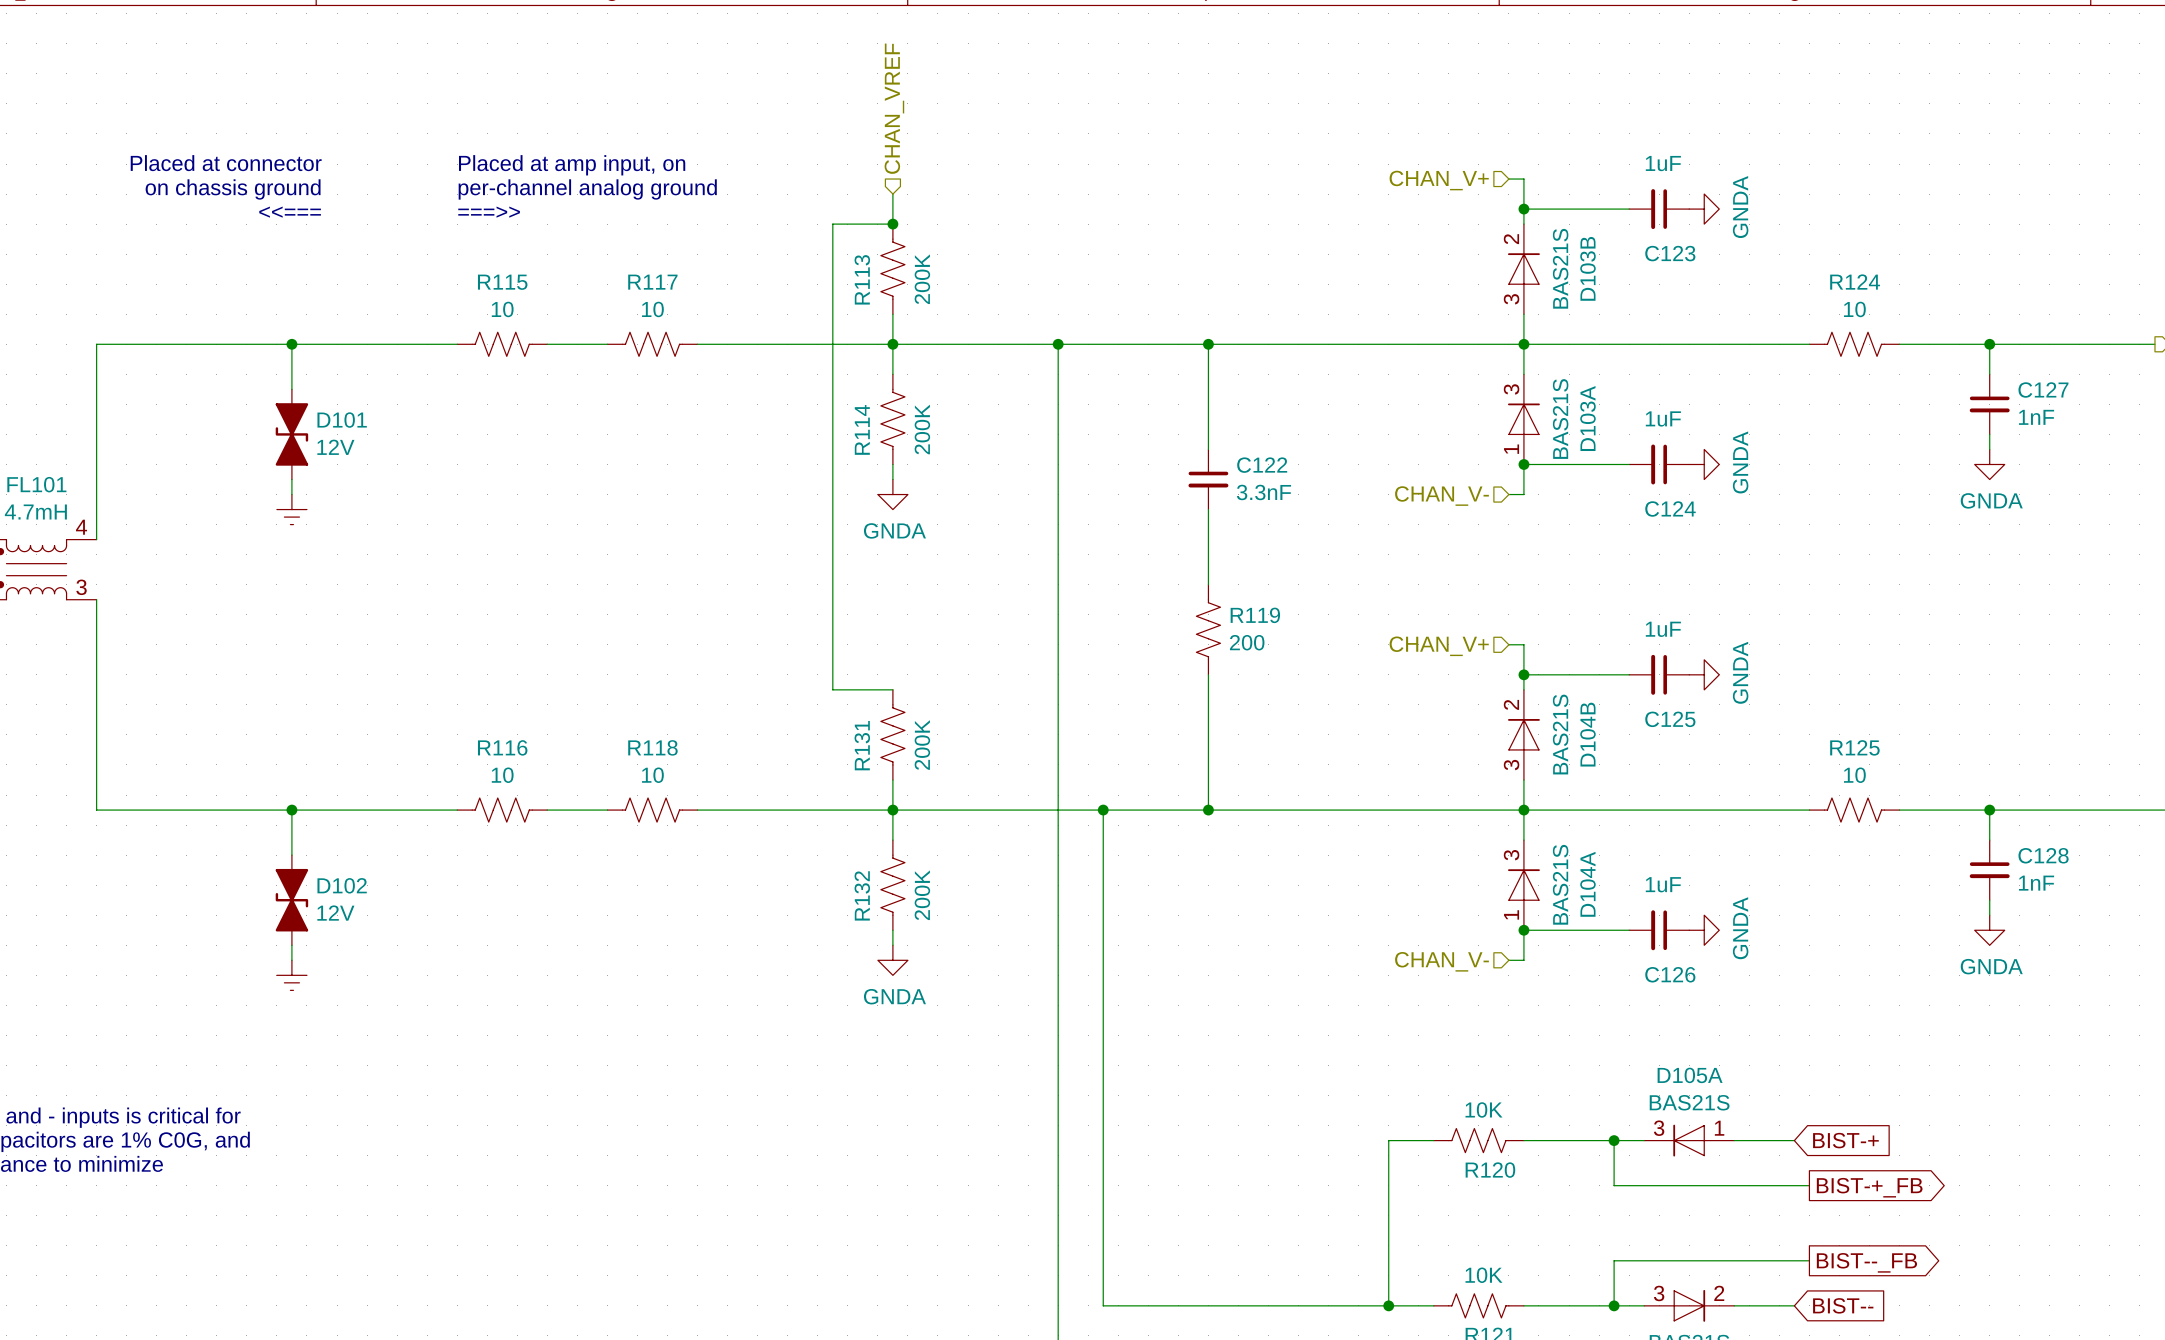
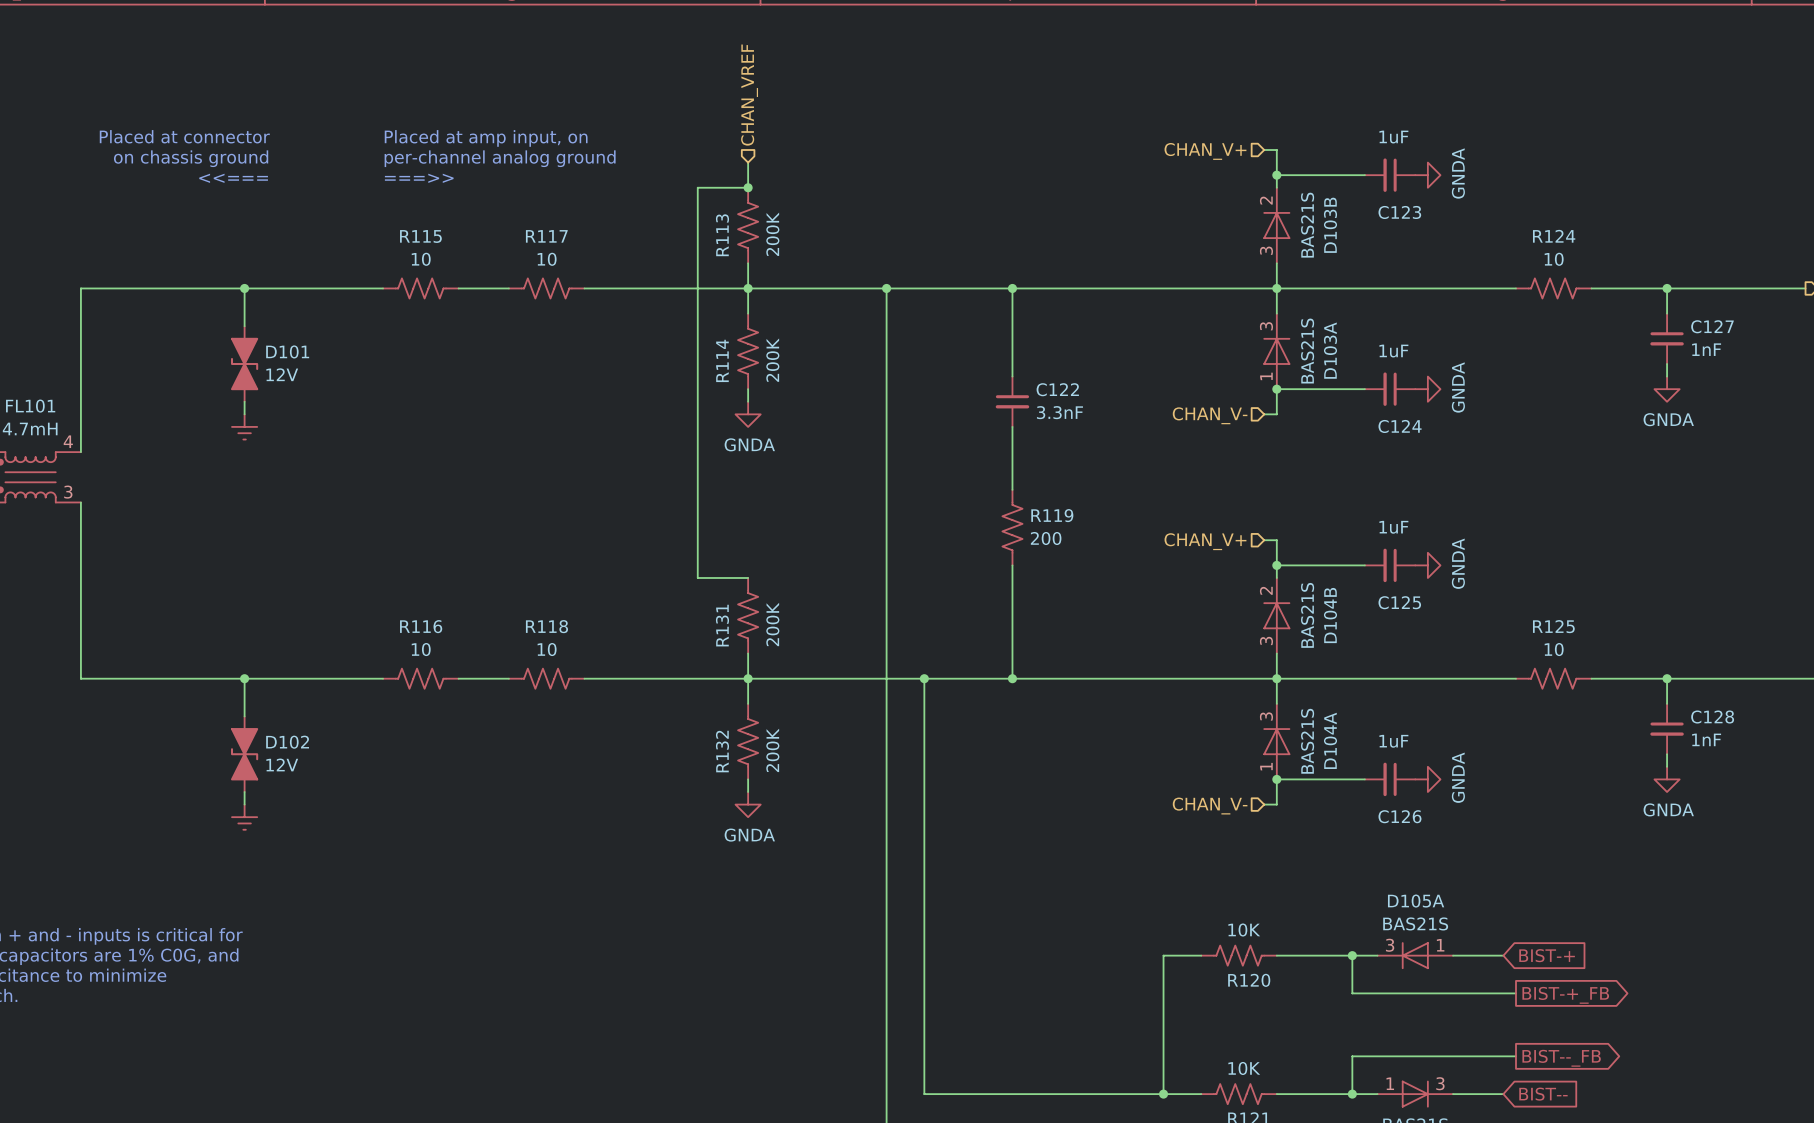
part pin number: 3 (1659, 1293) -> 1 (1390, 1083)
part pin number: 2 (1719, 1293) -> 3 (1440, 1083)

